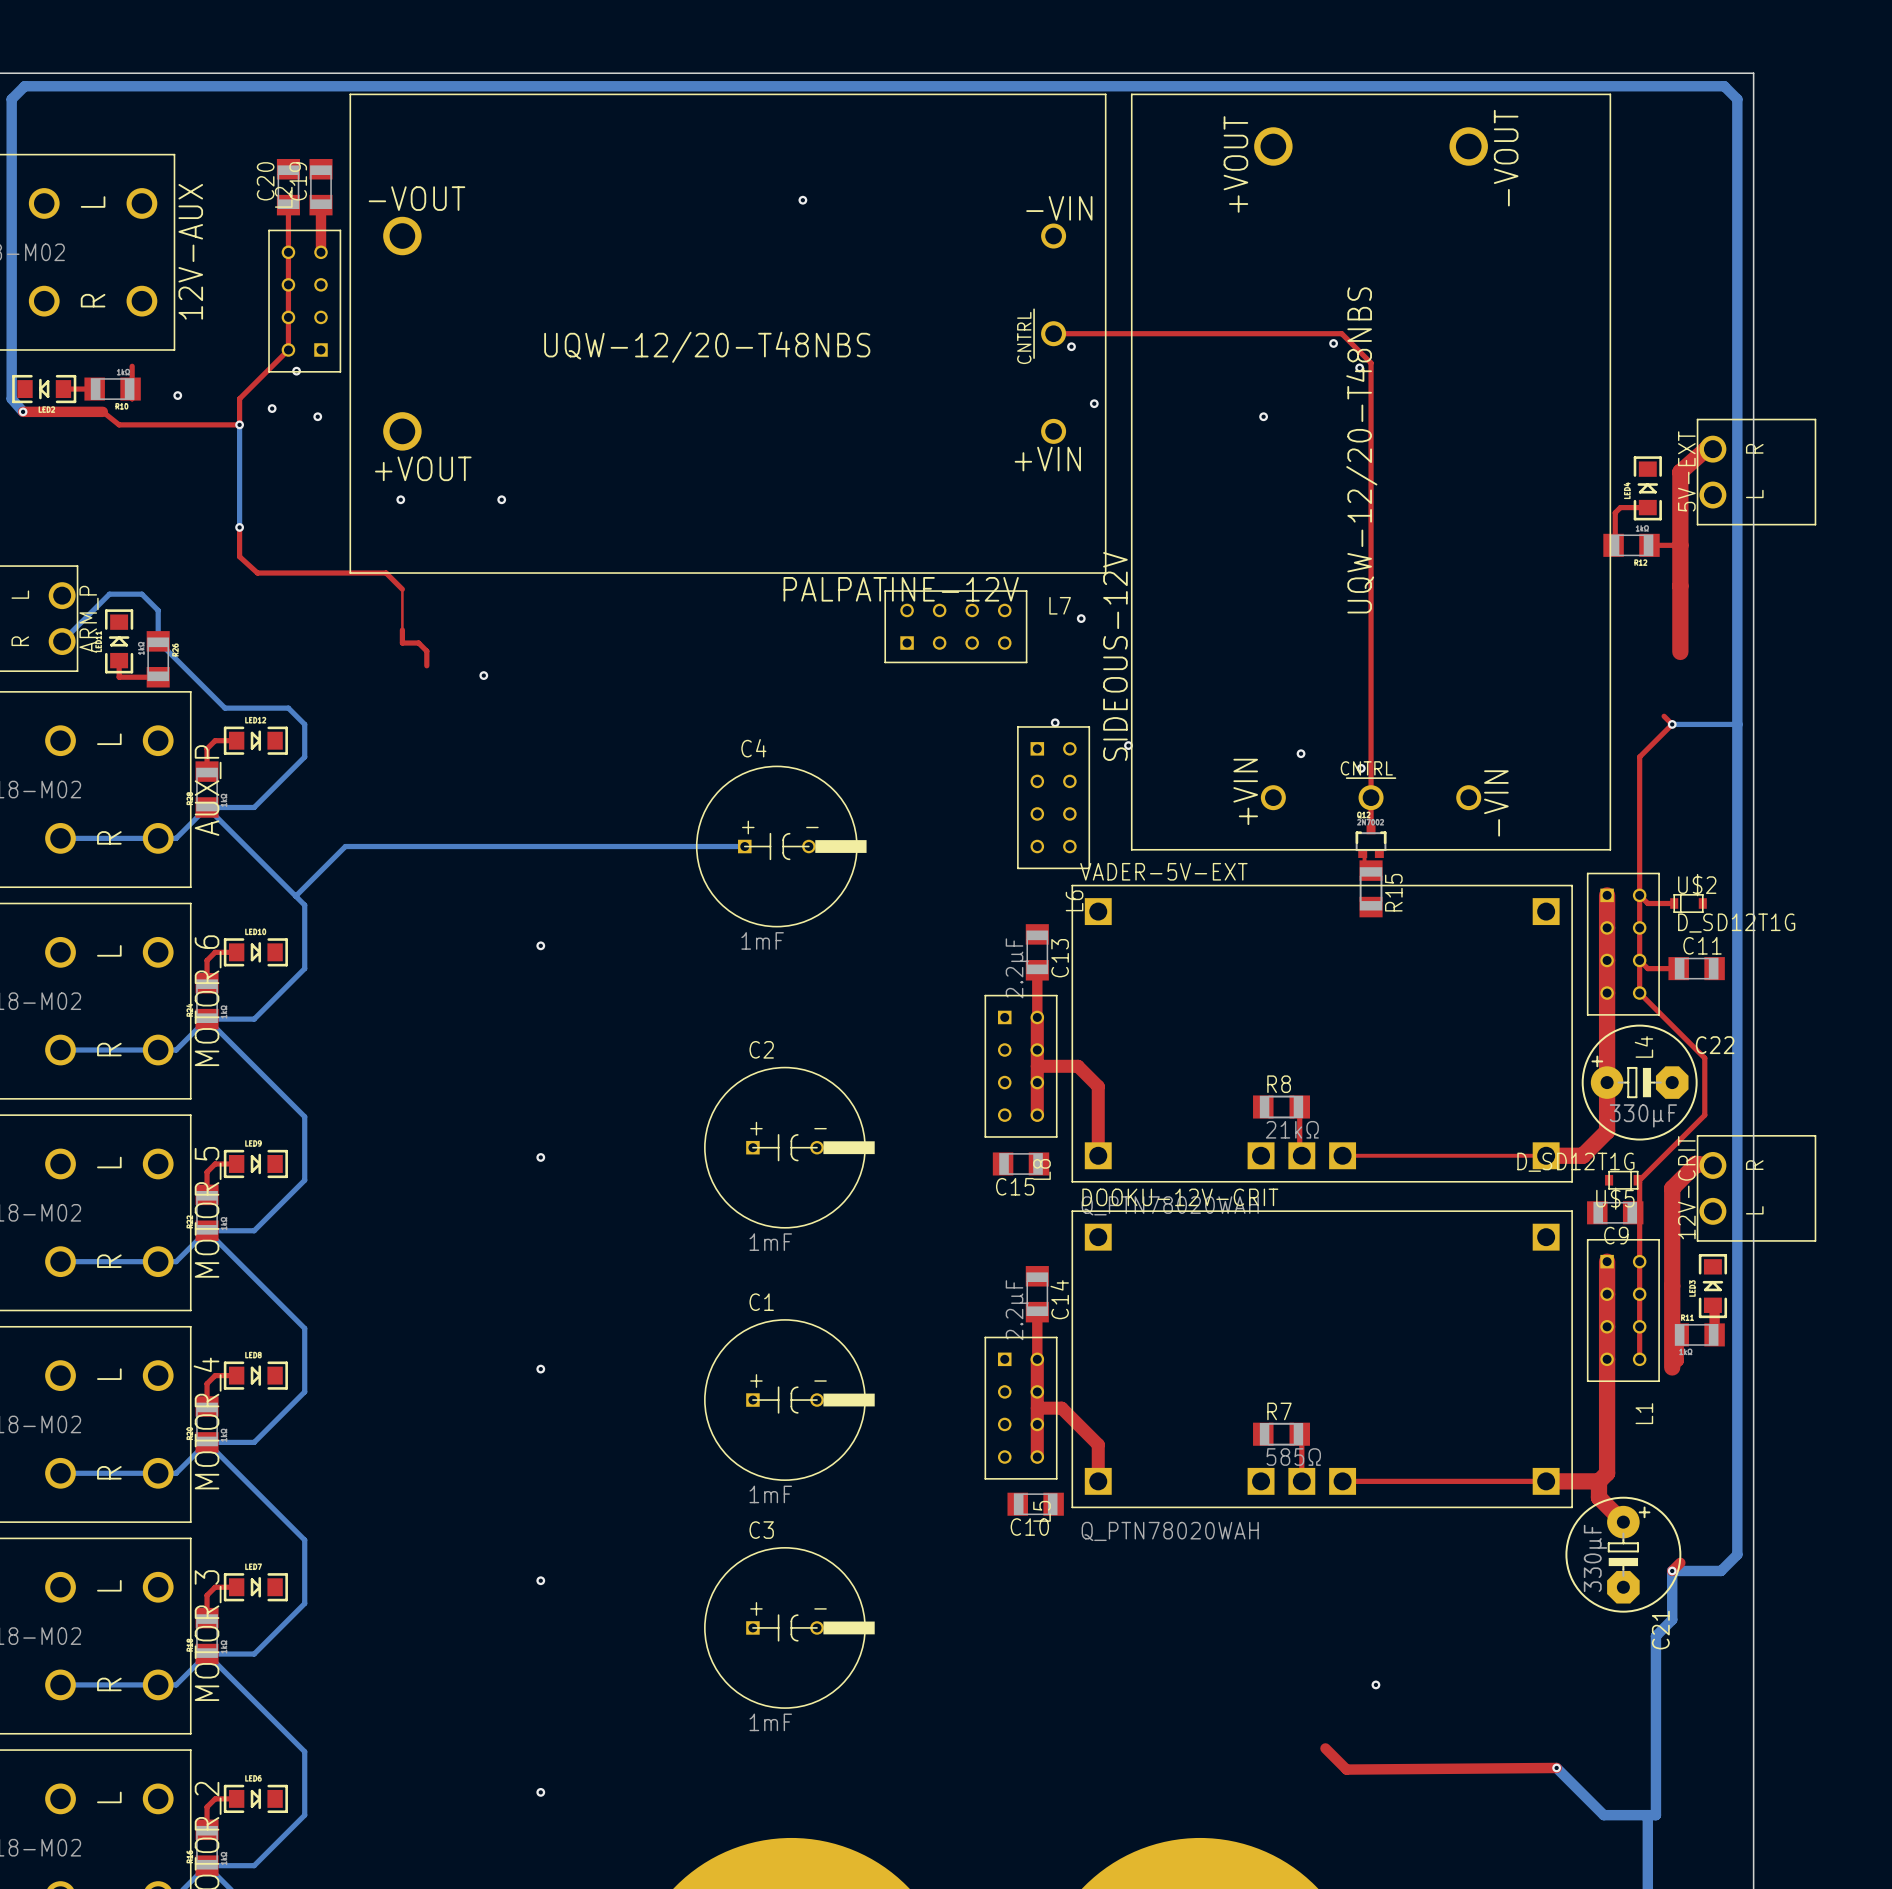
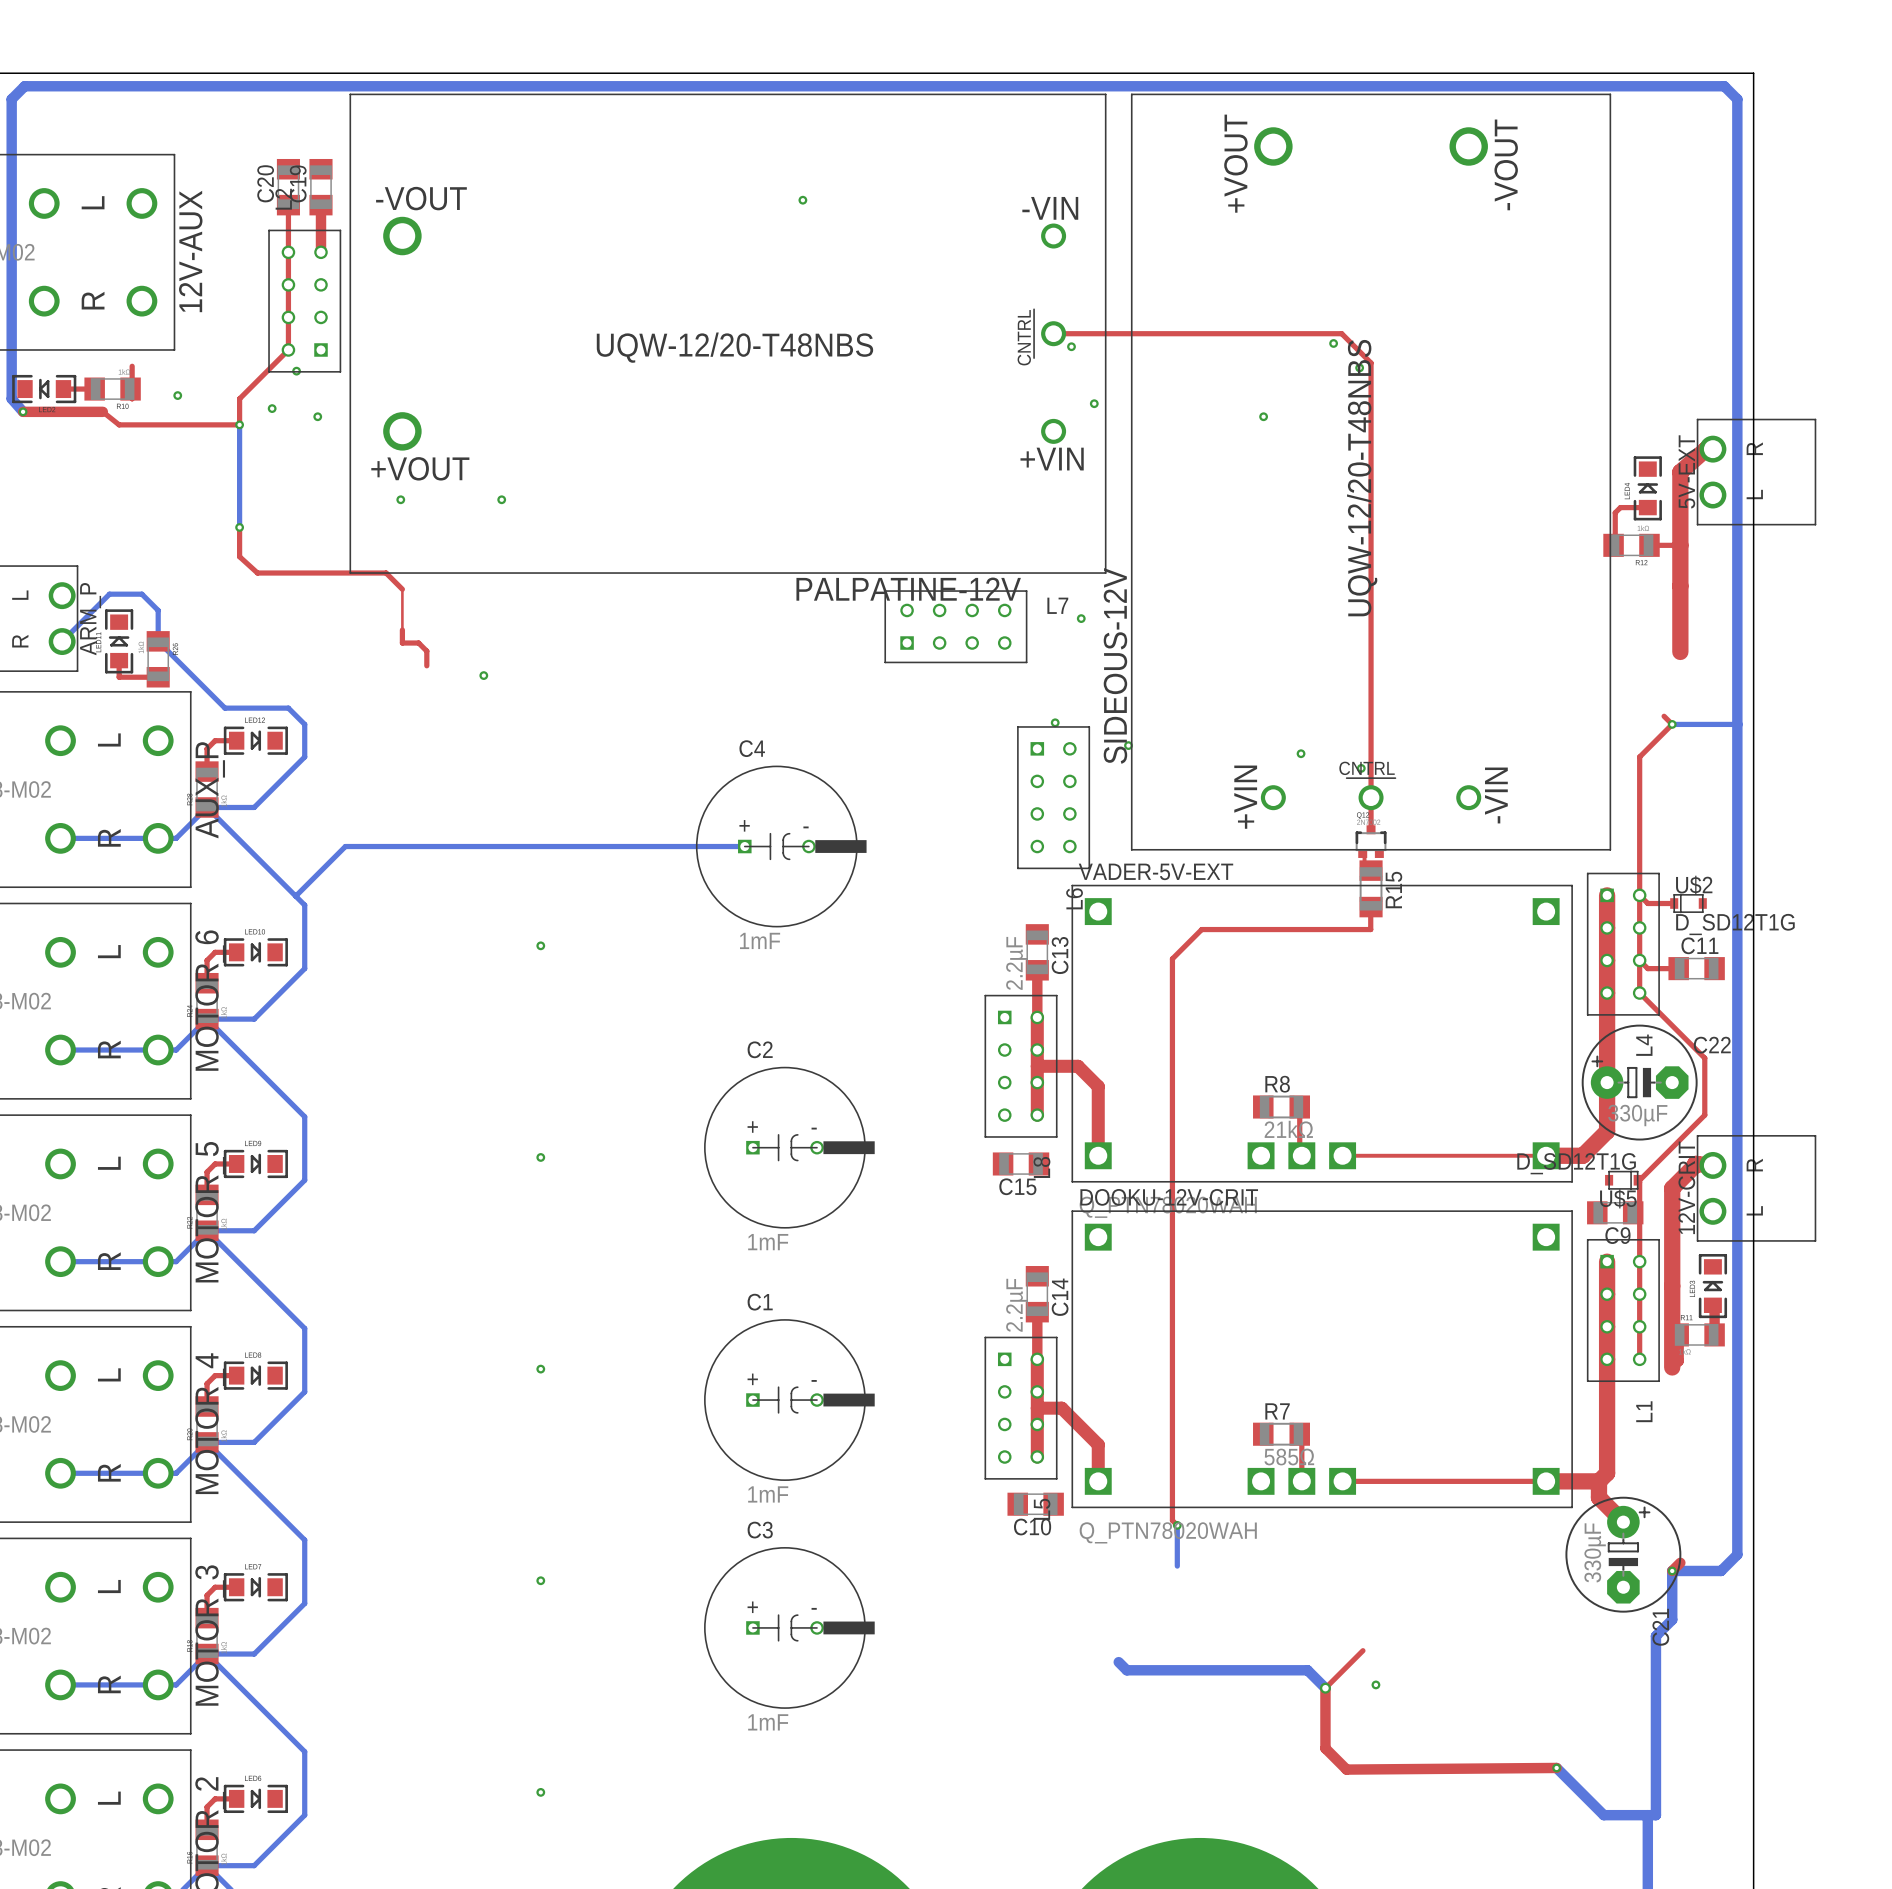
top track: none -> (1371, 907) (1370, 929) (1201, 929) (1172, 958) (1172, 1520) (1177, 1525)
bottom track: none -> (1177, 1525) (1177, 1566)
via: none -> (1177, 1525)
top track: none -> (1362, 1650) (1325, 1688) (1325, 1748)
bottom track: none -> (1118, 1662) (1126, 1670) (1307, 1670) (1325, 1688)
via: none -> (1325, 1688)

